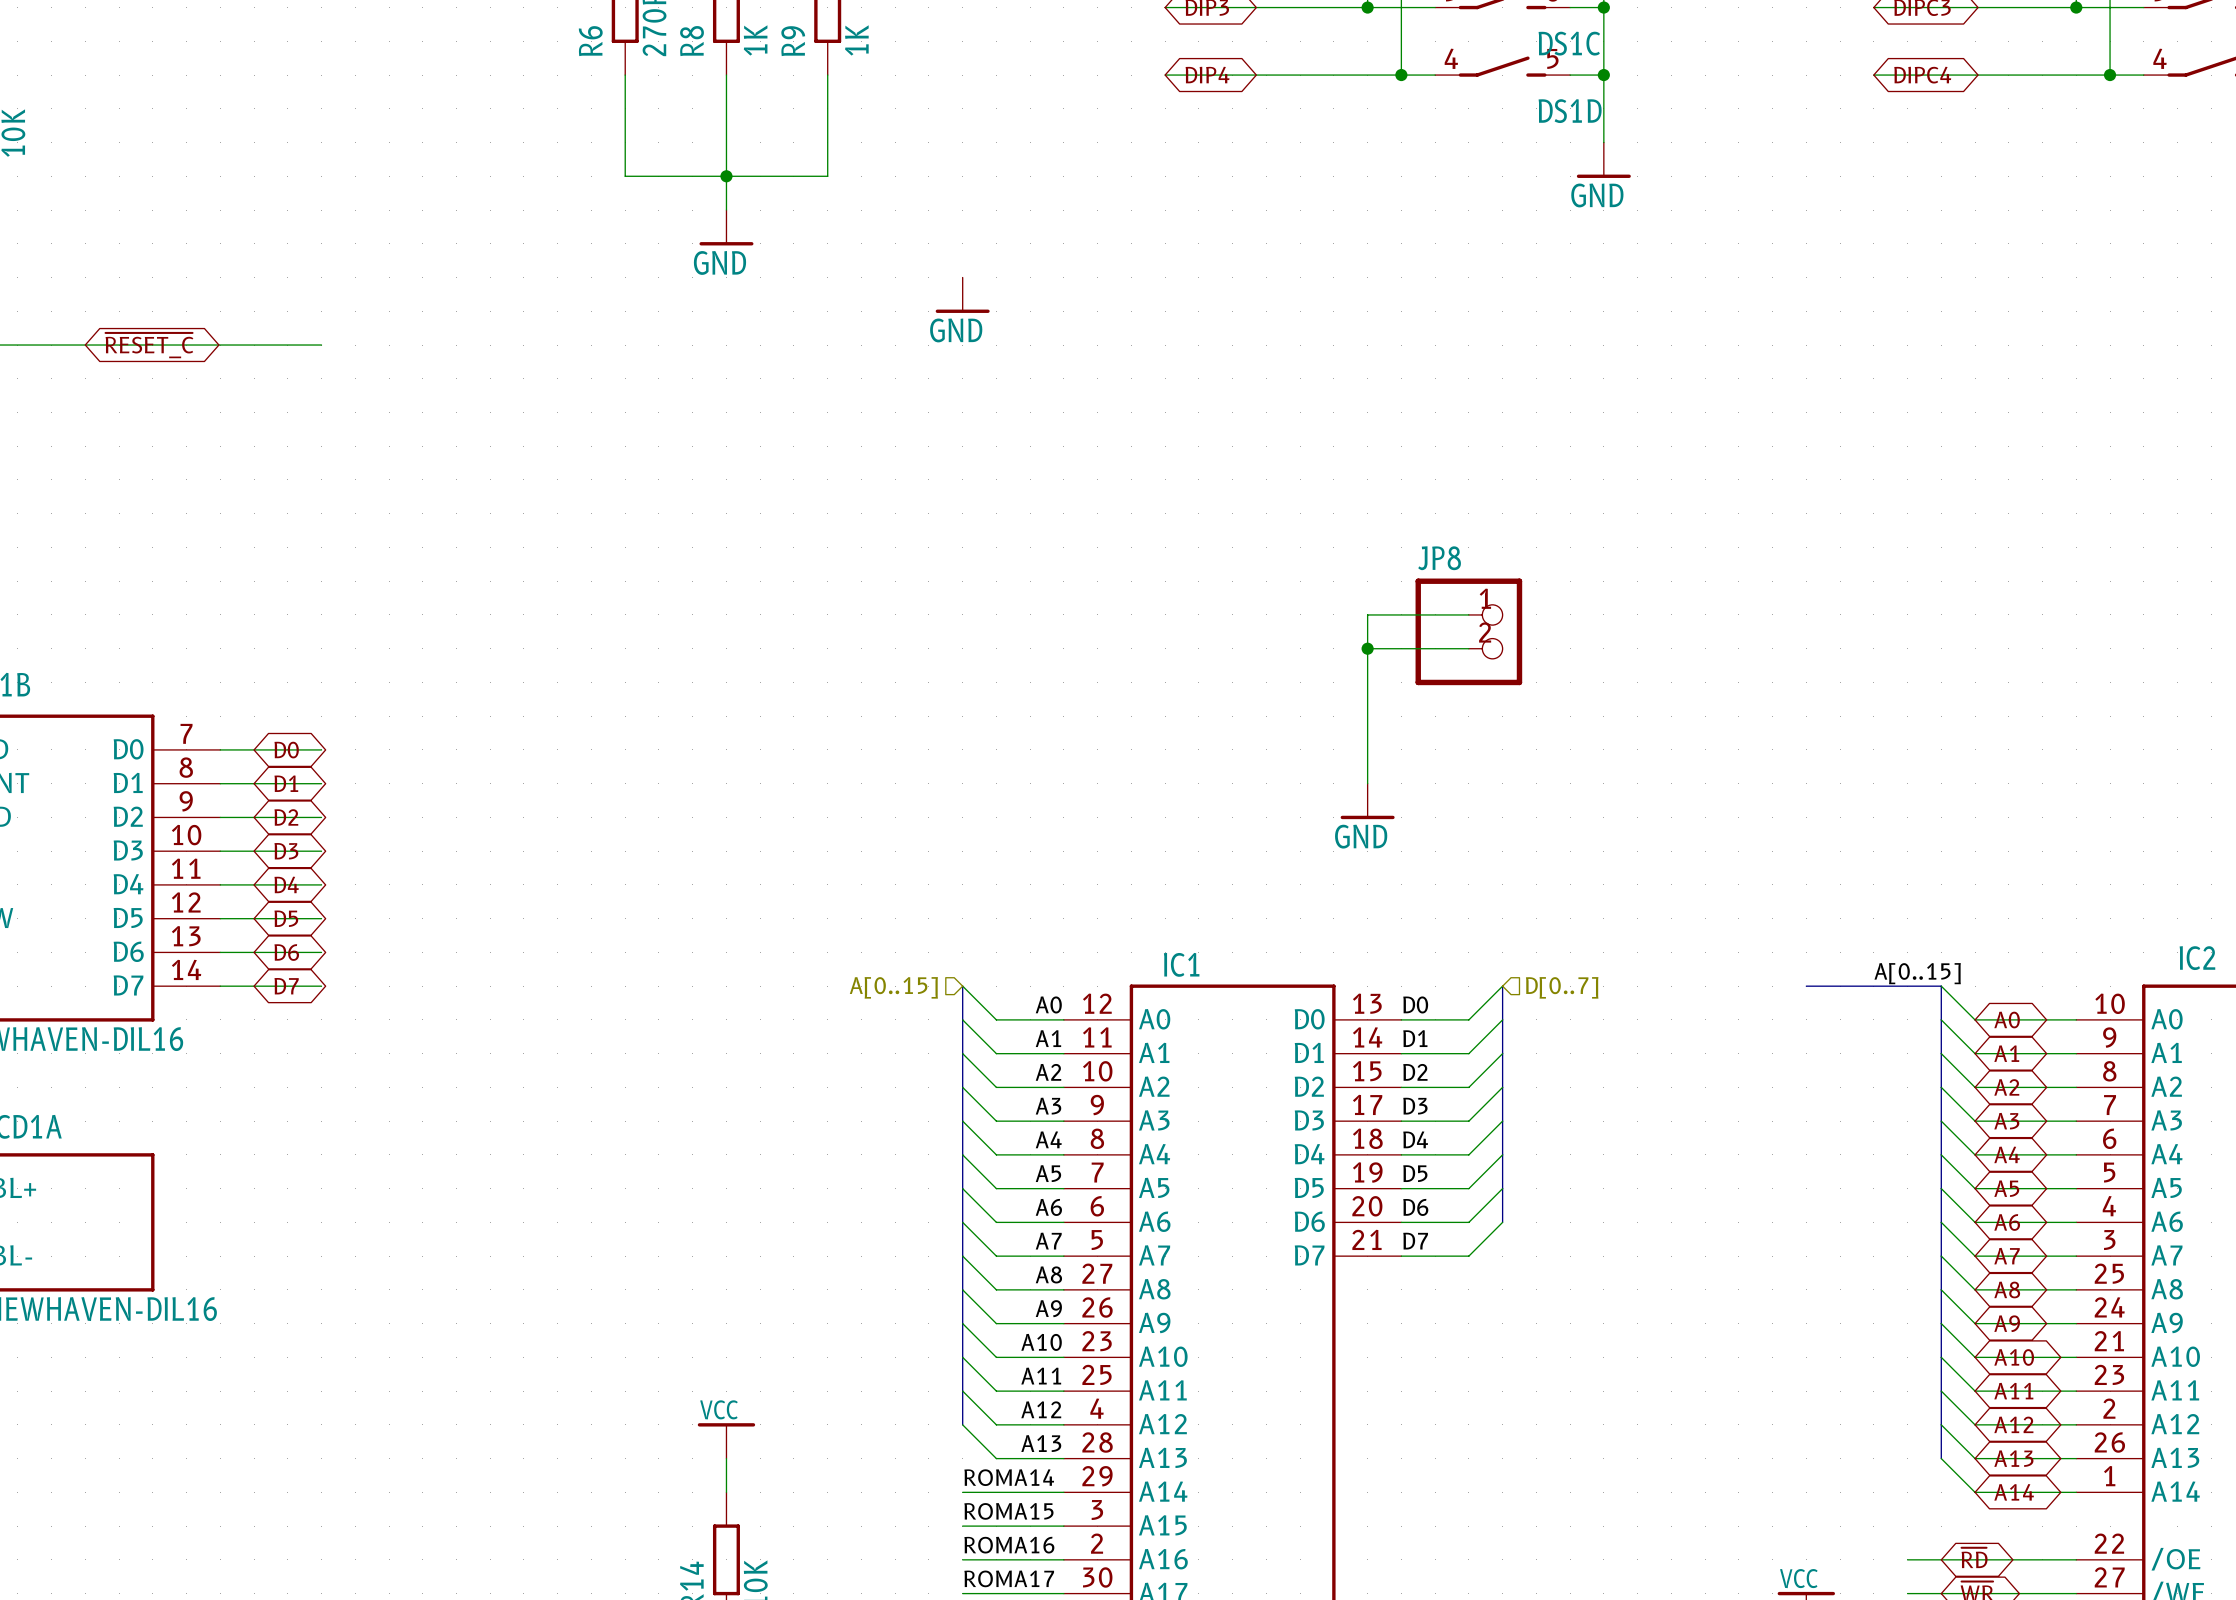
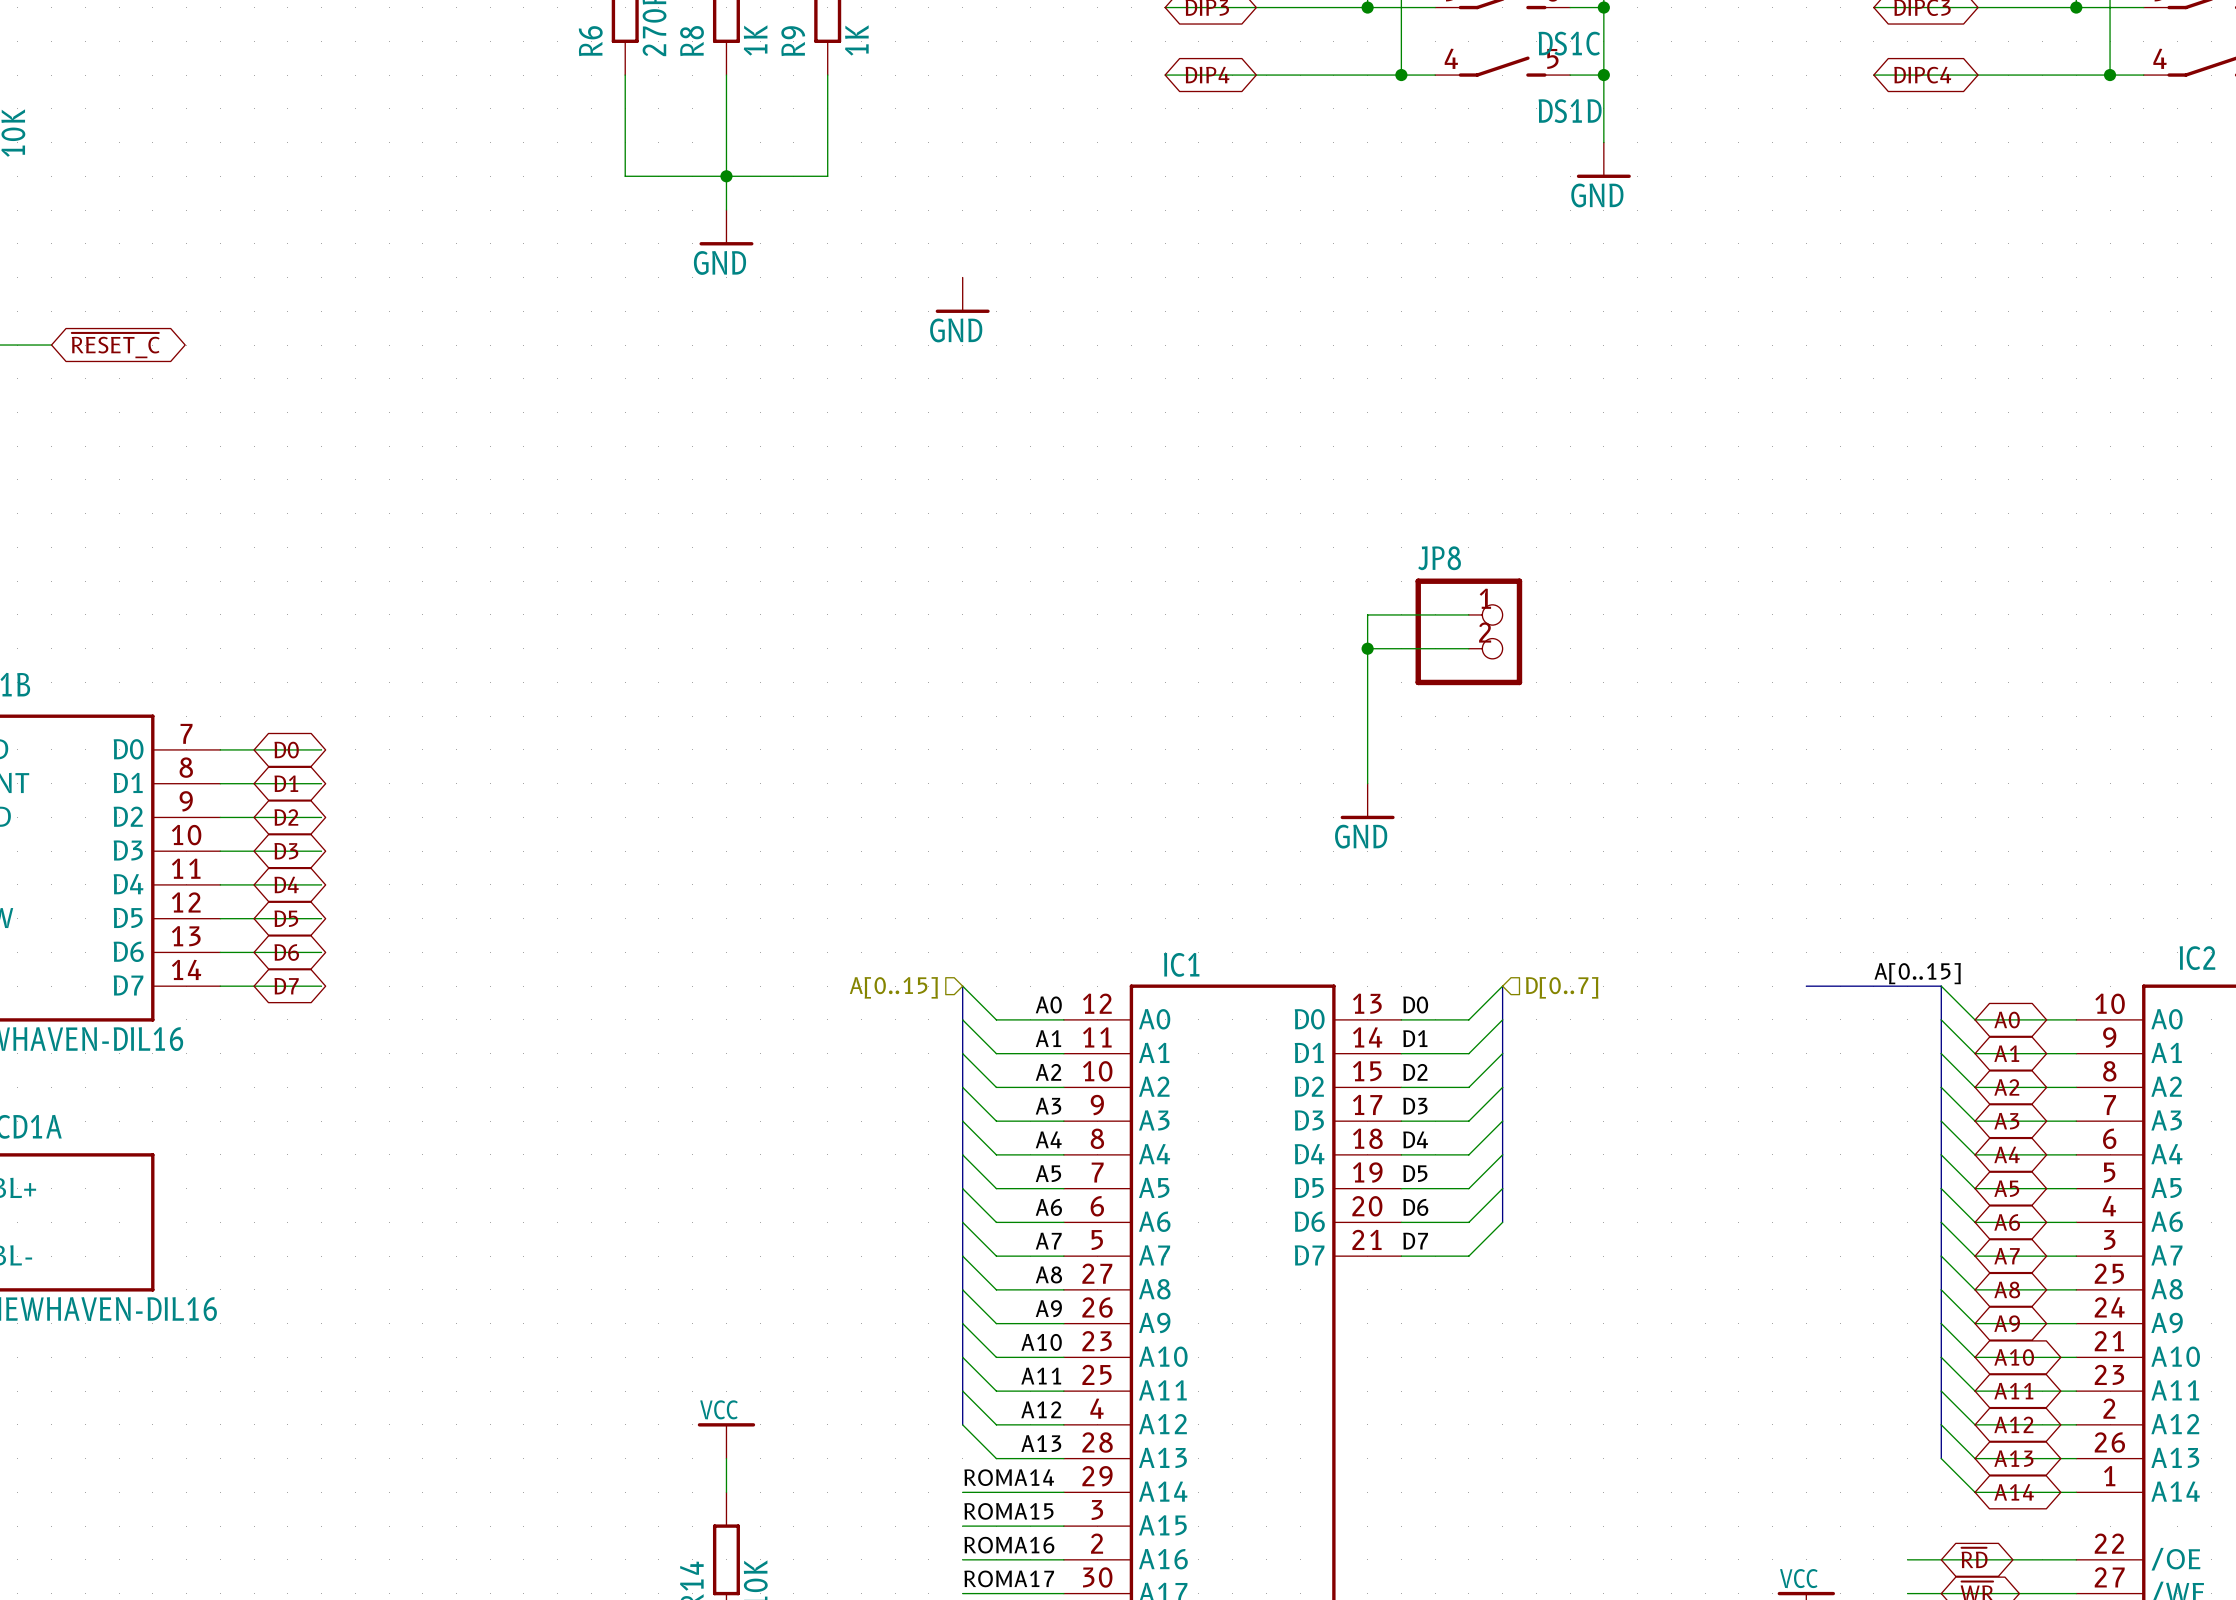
wire: (51, 345) (321, 345) -> none
global label position: ~{RESET_C} (149, 345) -> ~{RESET_C} (115, 345)

